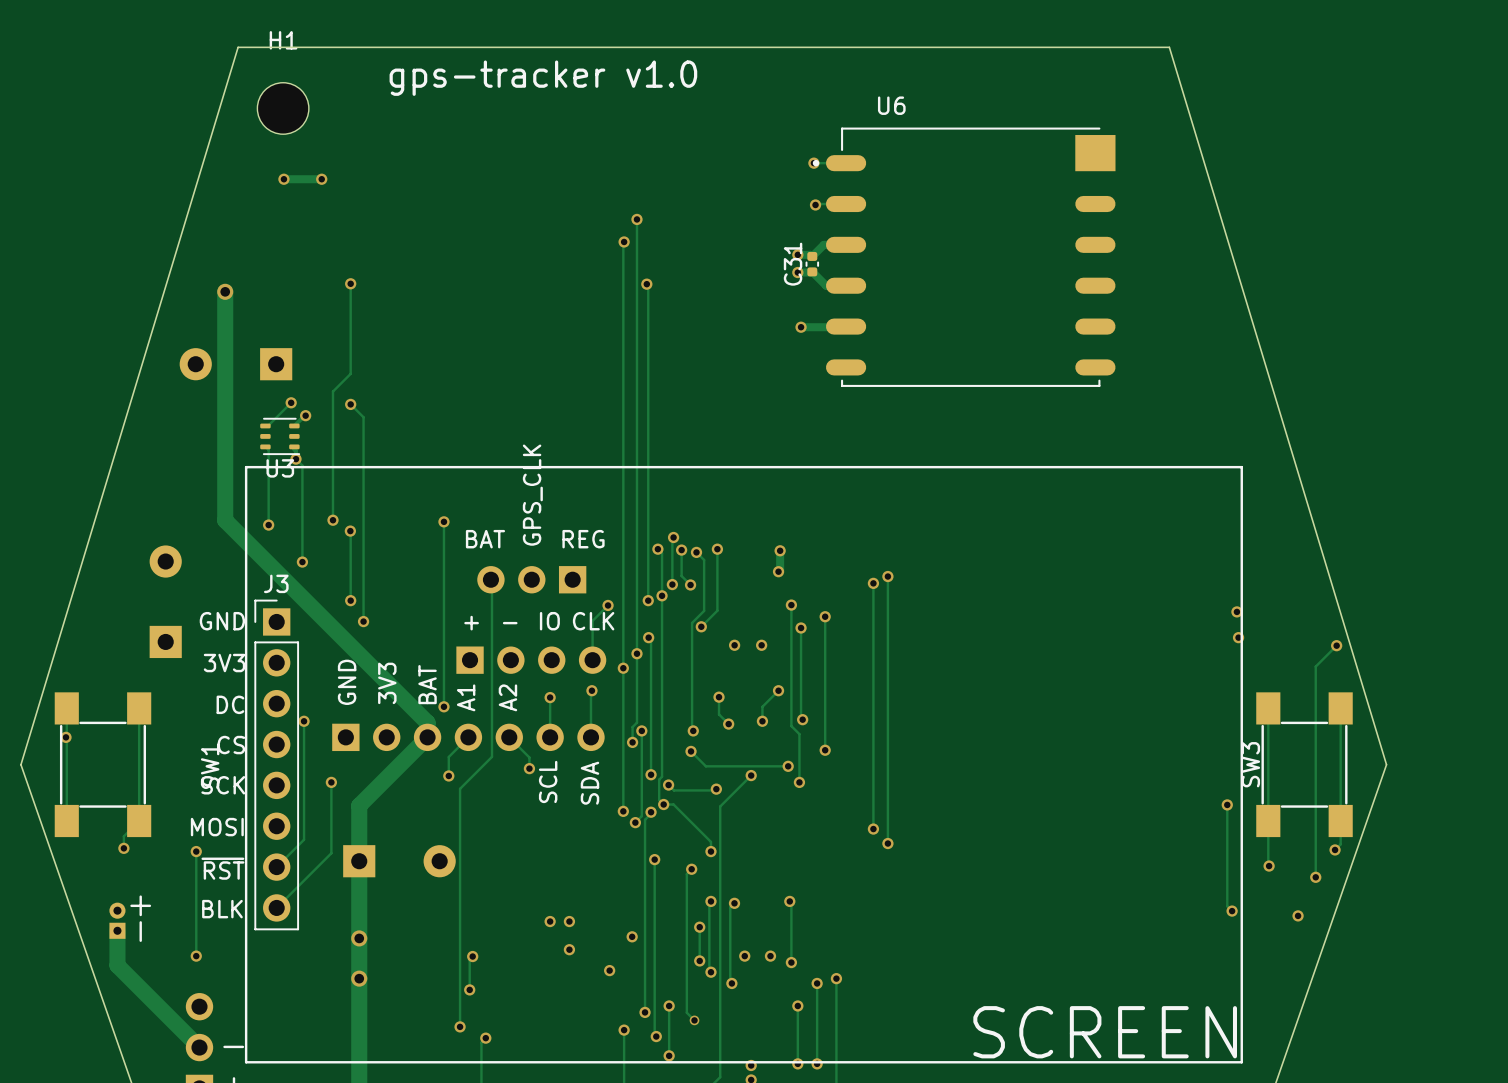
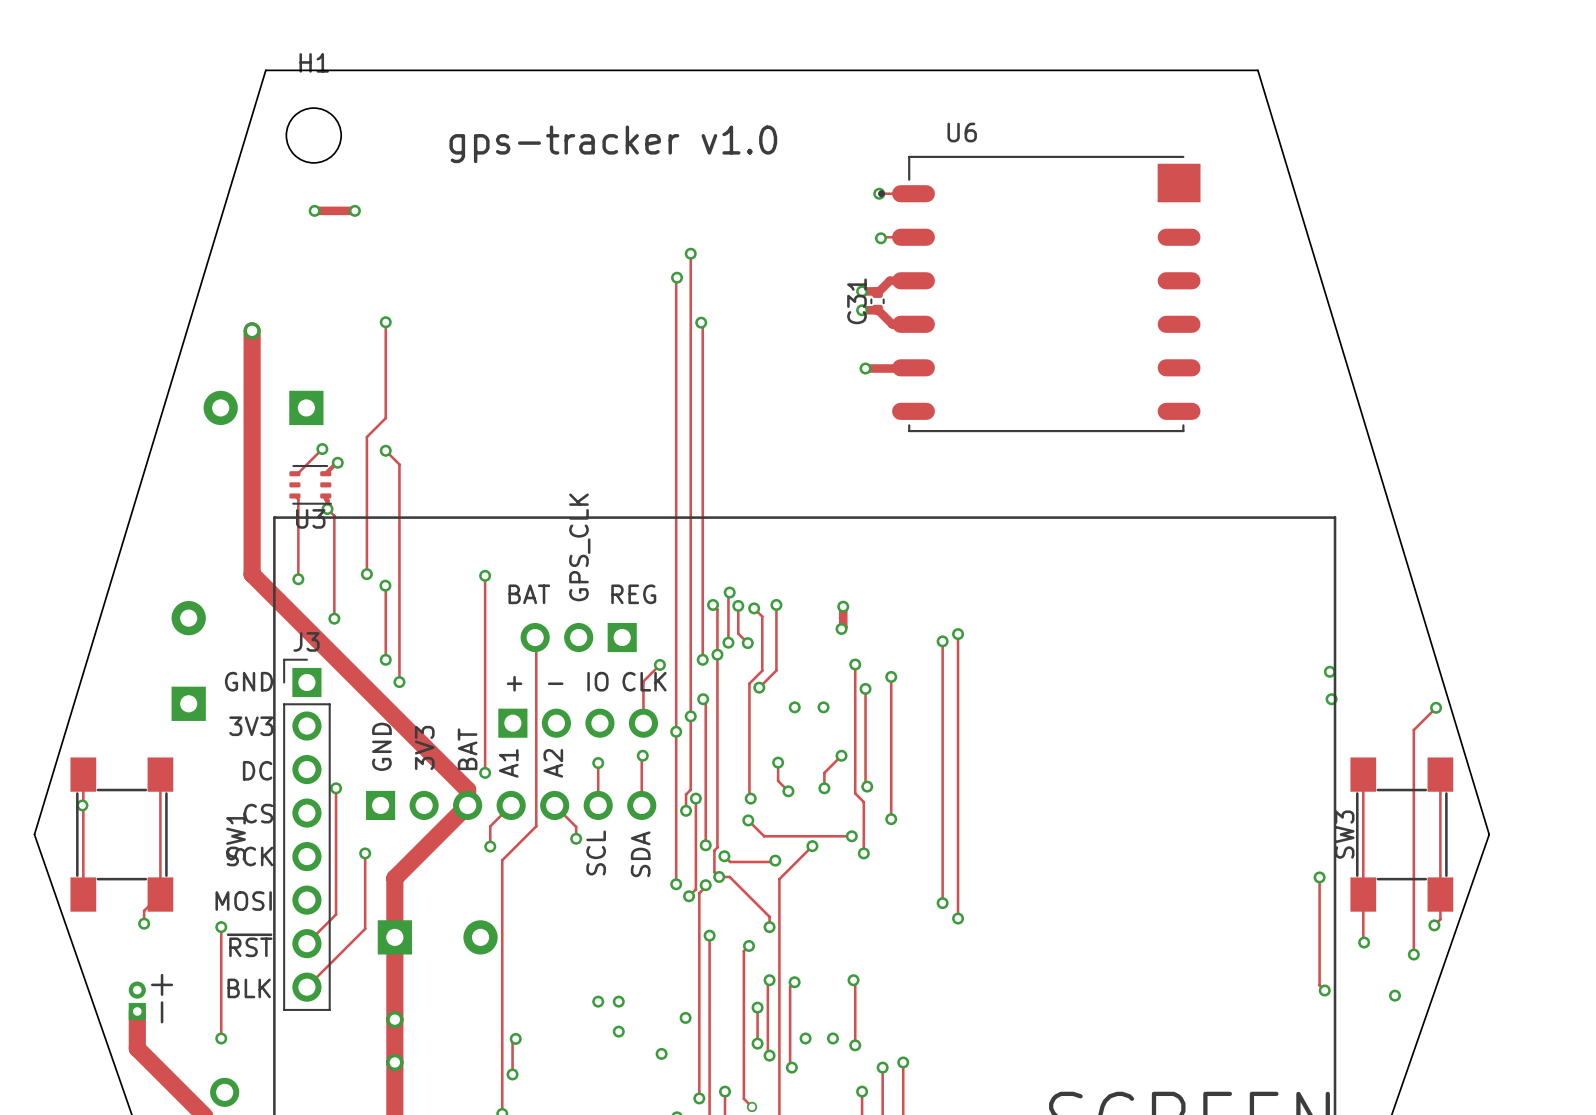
text position: gps-tracker v1.0 (543, 78) -> gps-tracker v1.0 (613, 144)

